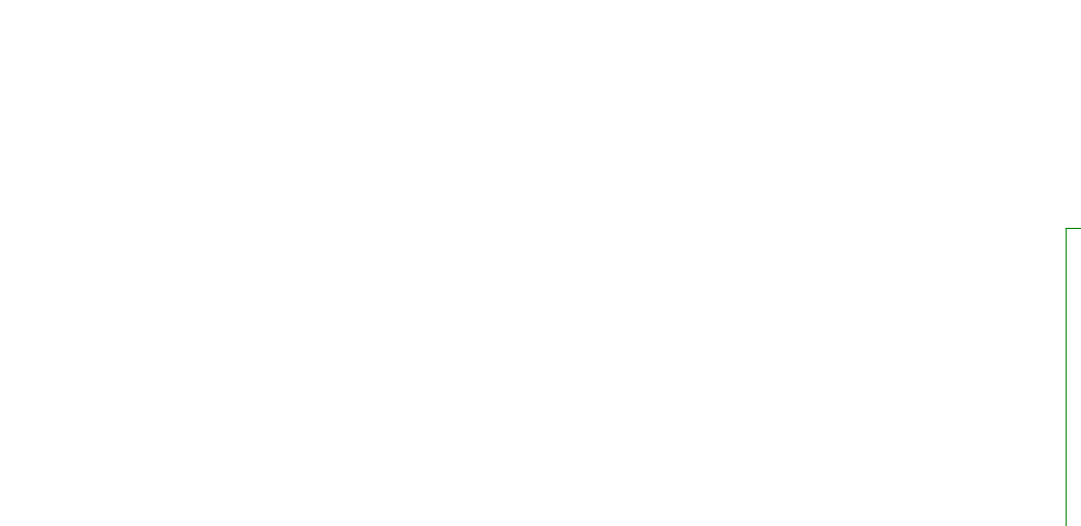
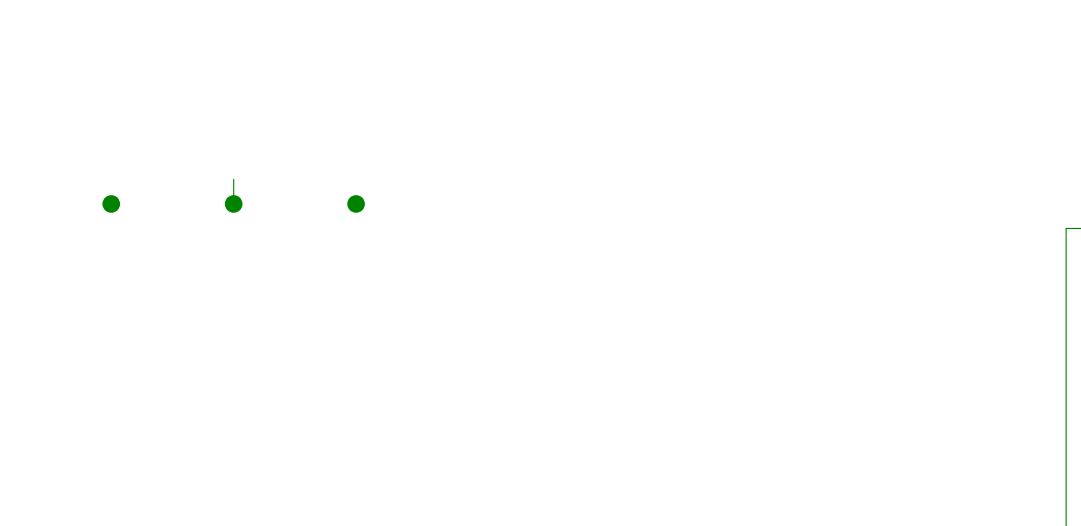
wire: none -> (233, 179) (233, 203)
junction: none -> (111, 203)
junction: none -> (233, 203)
junction: none -> (356, 203)

